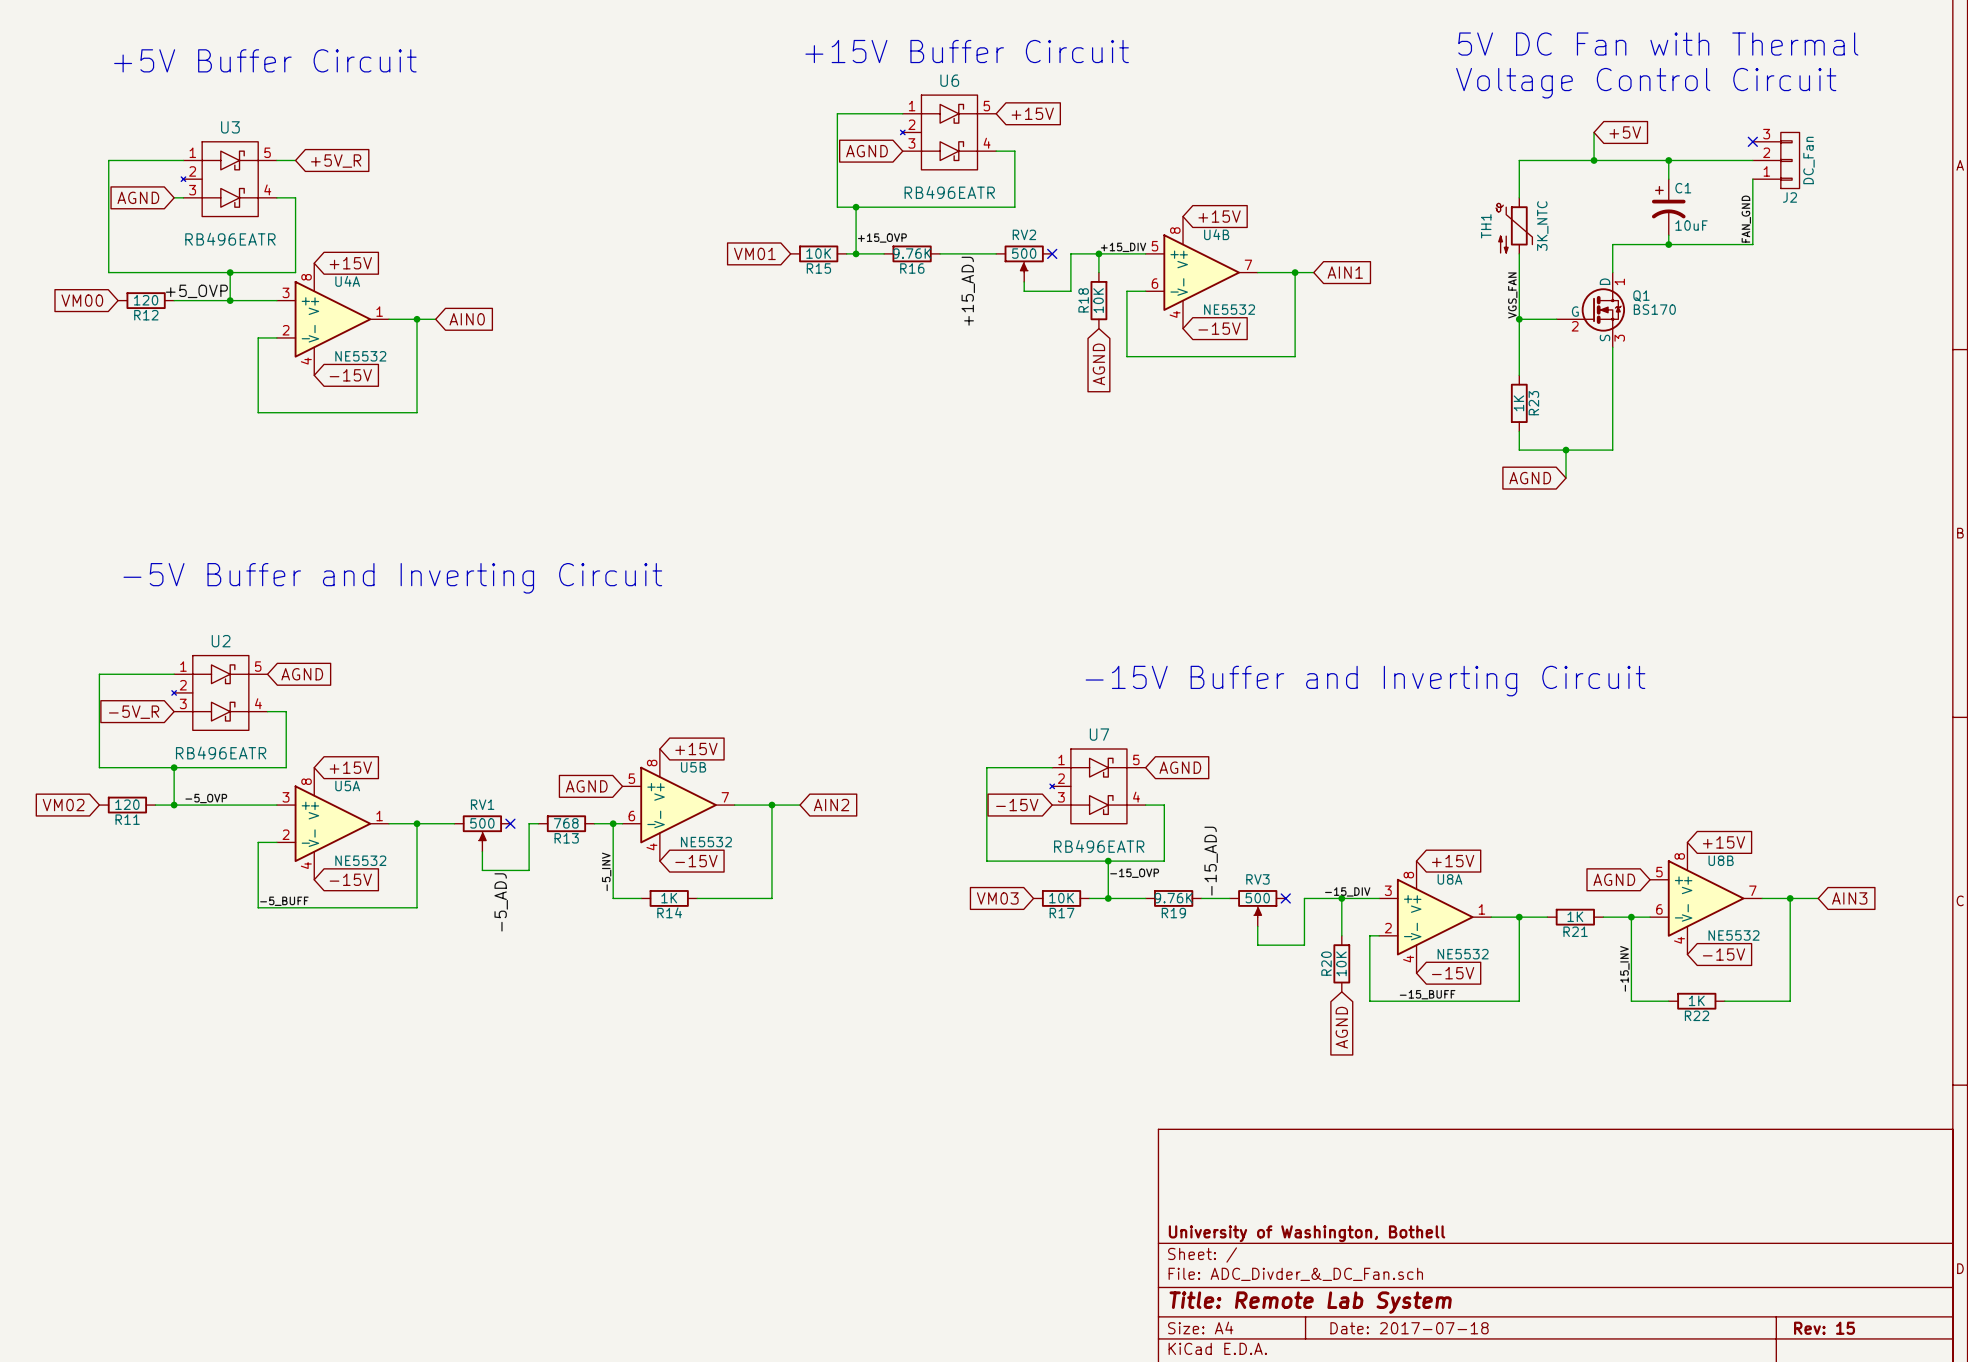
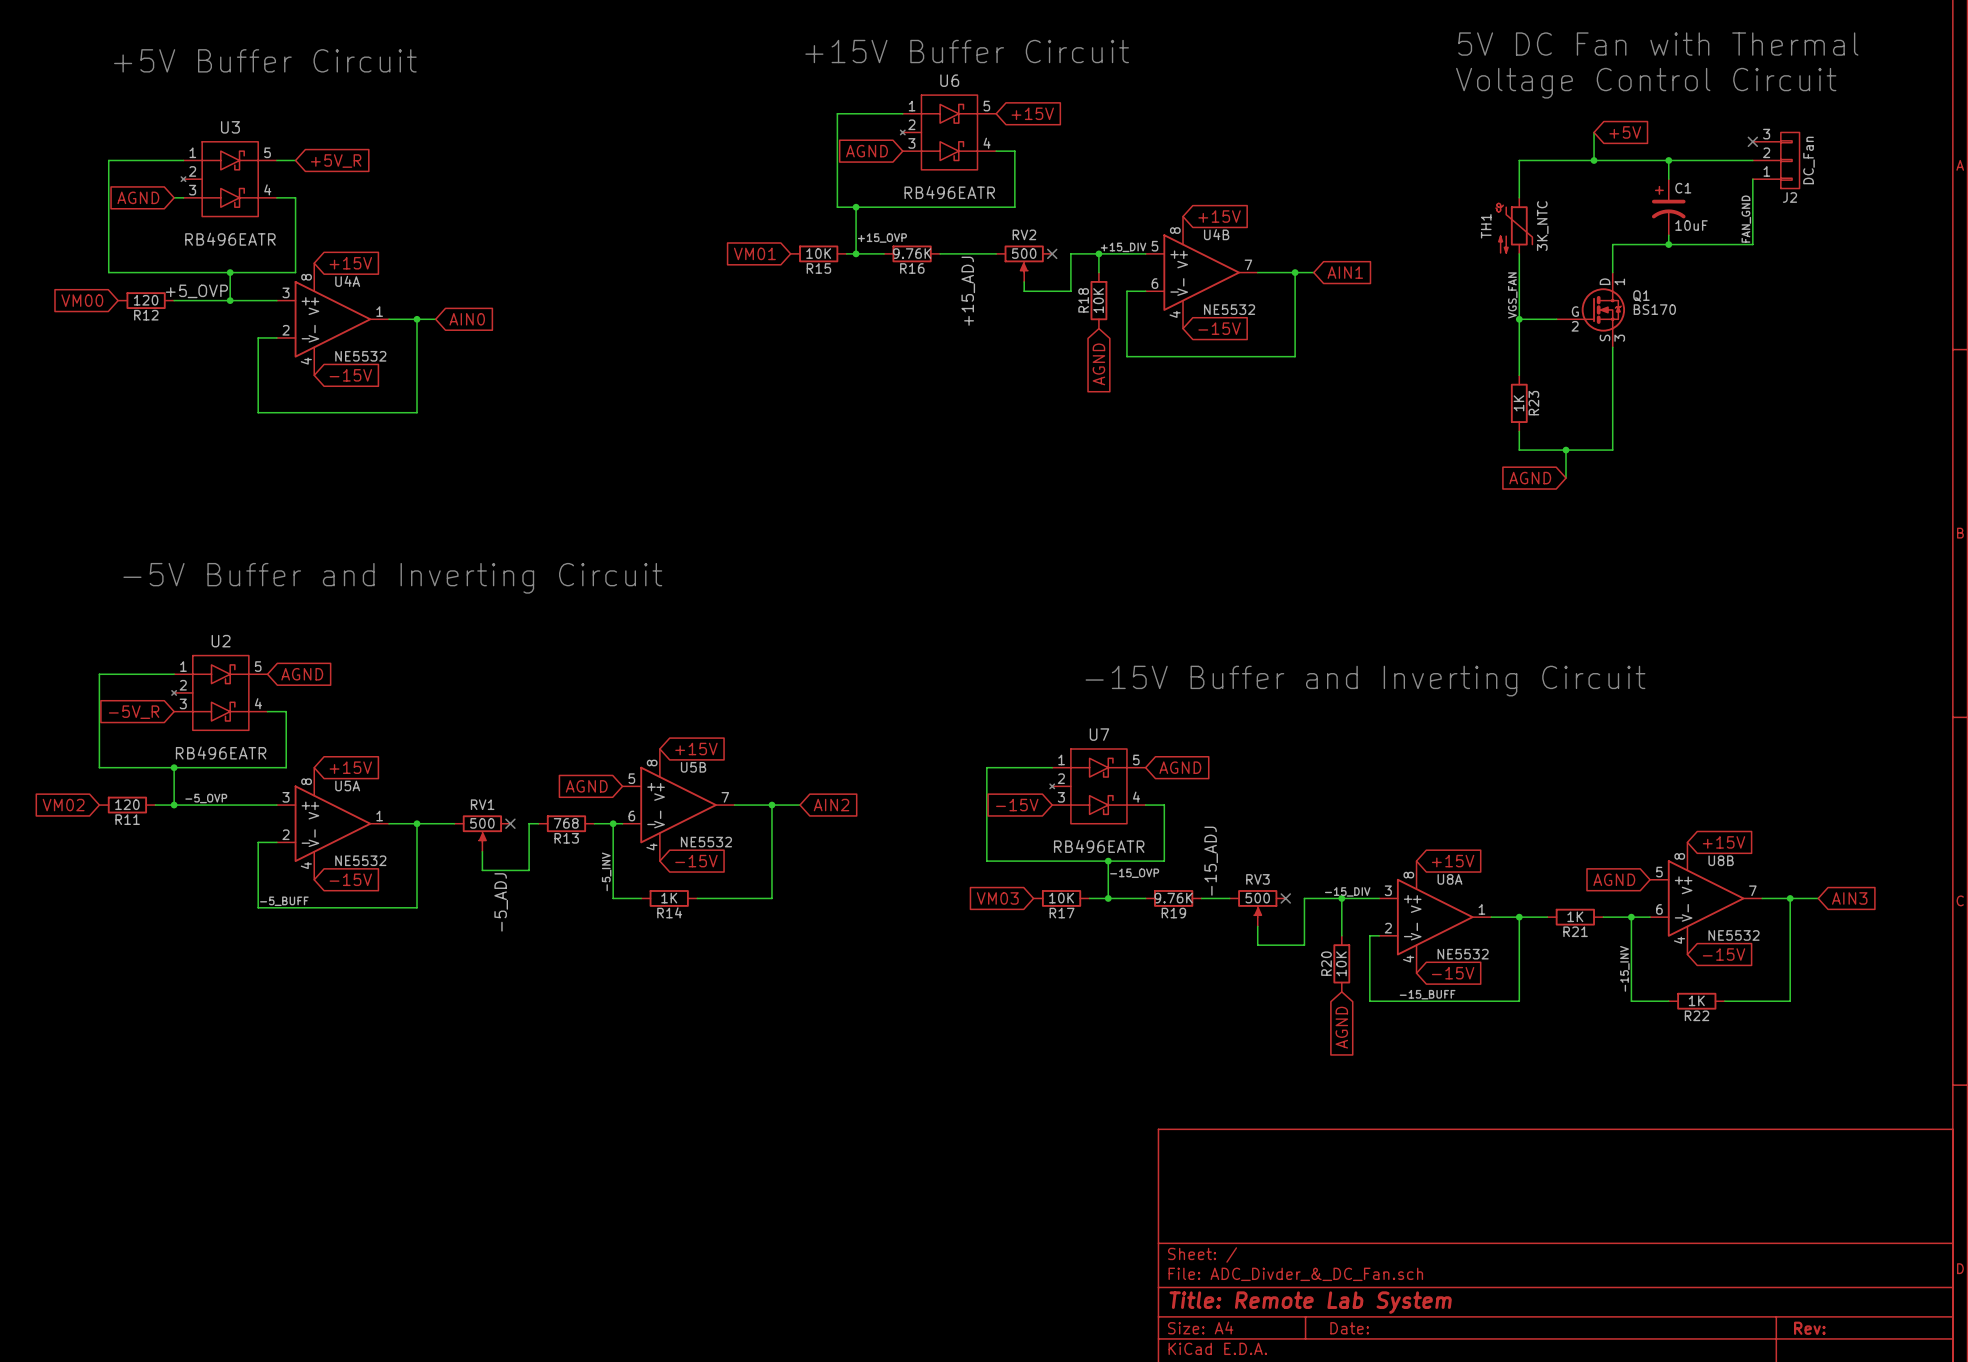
title block: University of Washington, Bothell (1307, 1233) -> none
title block: Date: 2017-07-18 (1409, 1328) -> Date: (1349, 1328)
title block: Rev: 15 (1824, 1328) -> Rev: (1809, 1328)

